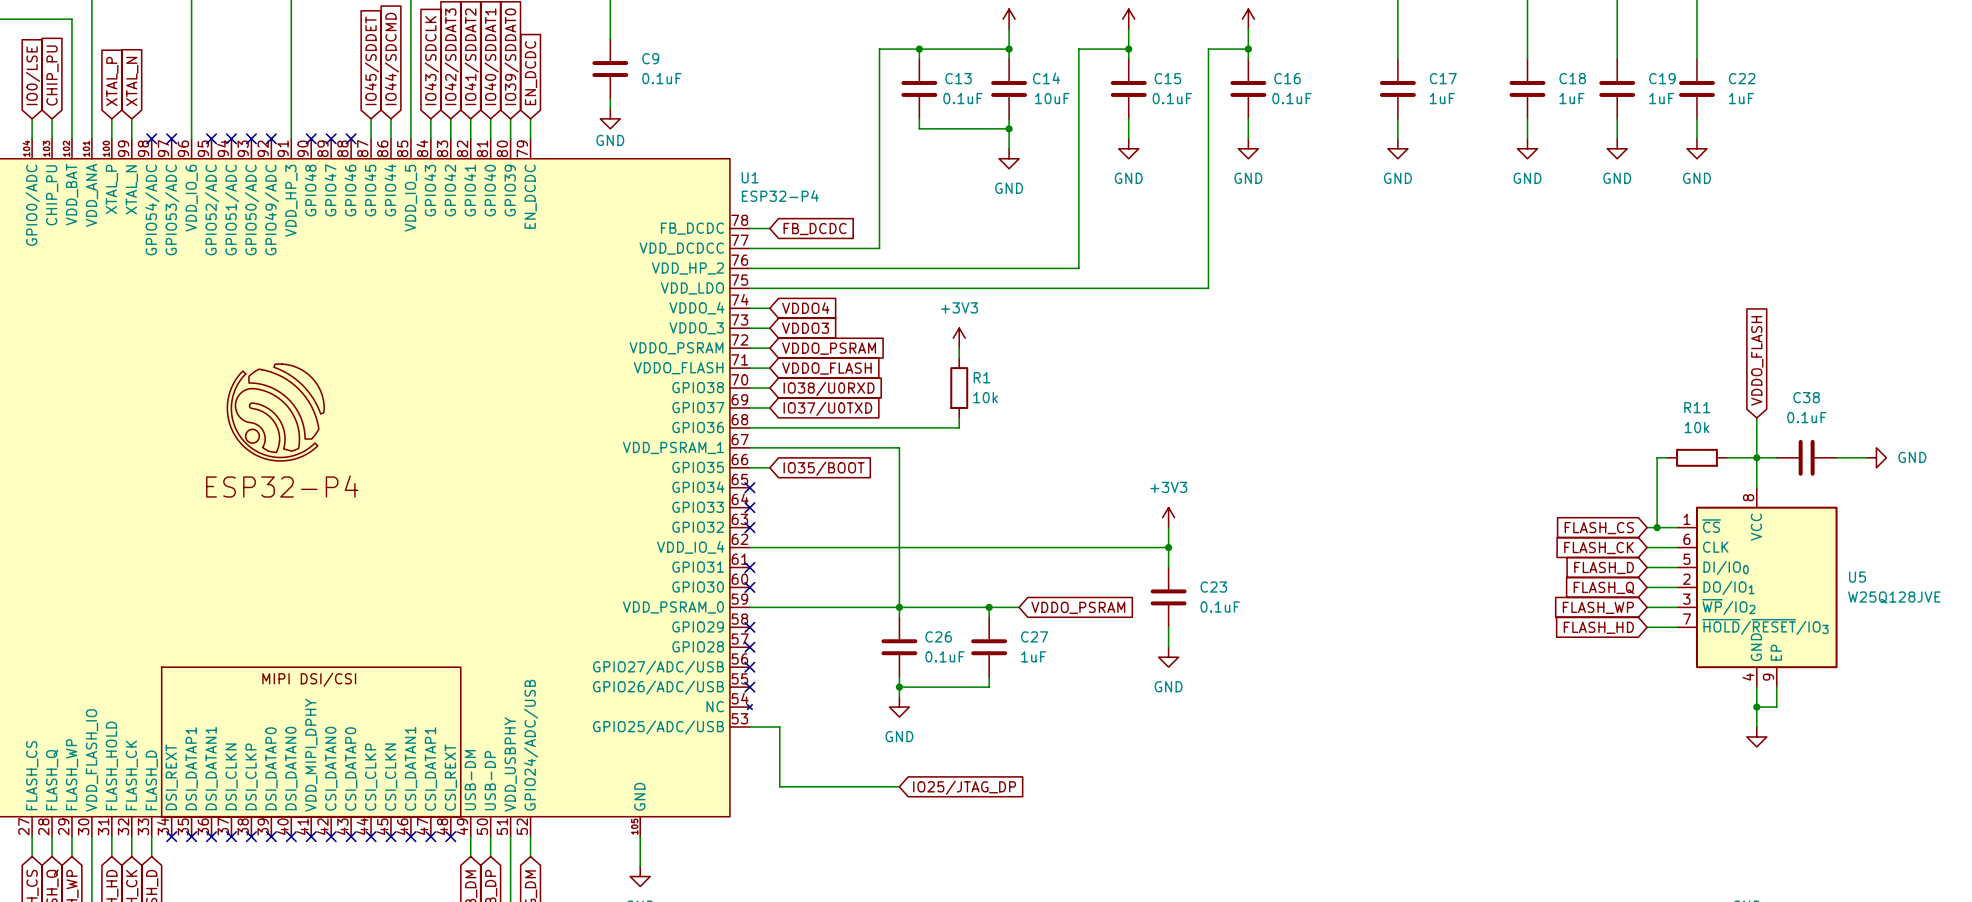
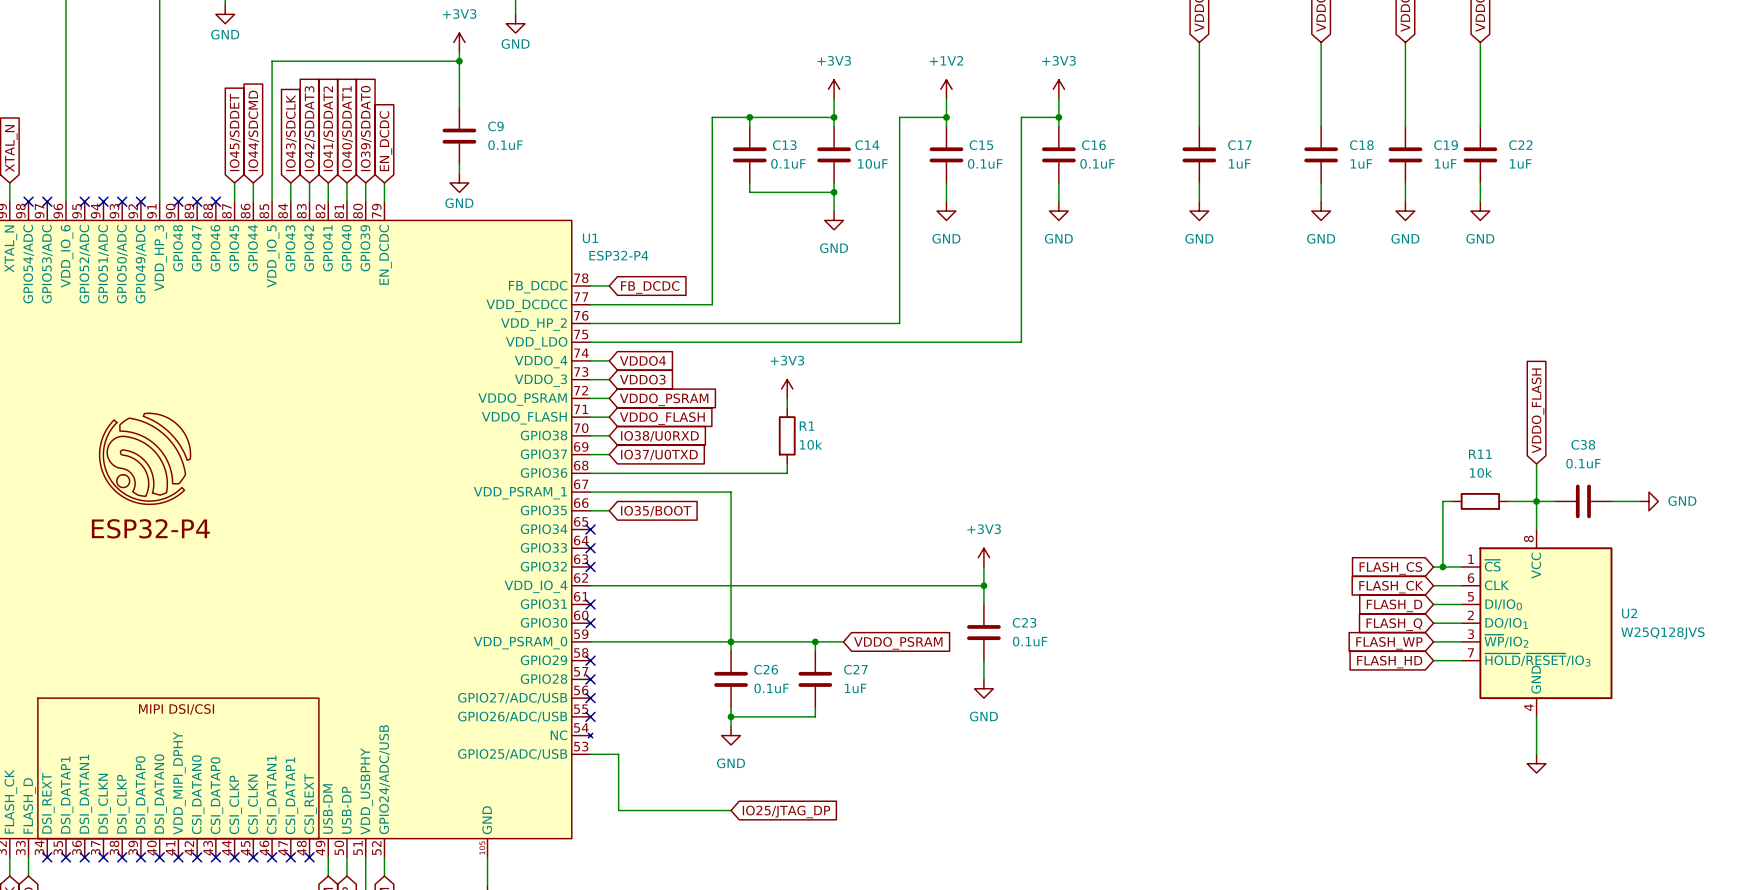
U5: W25Q128JVE (1757, 587) -> none
U2: none -> W25Q128JVS (1537, 623)
wire: (1776, 687) (1776, 707) (1756, 707) -> none
junction: (1756, 707) -> none

